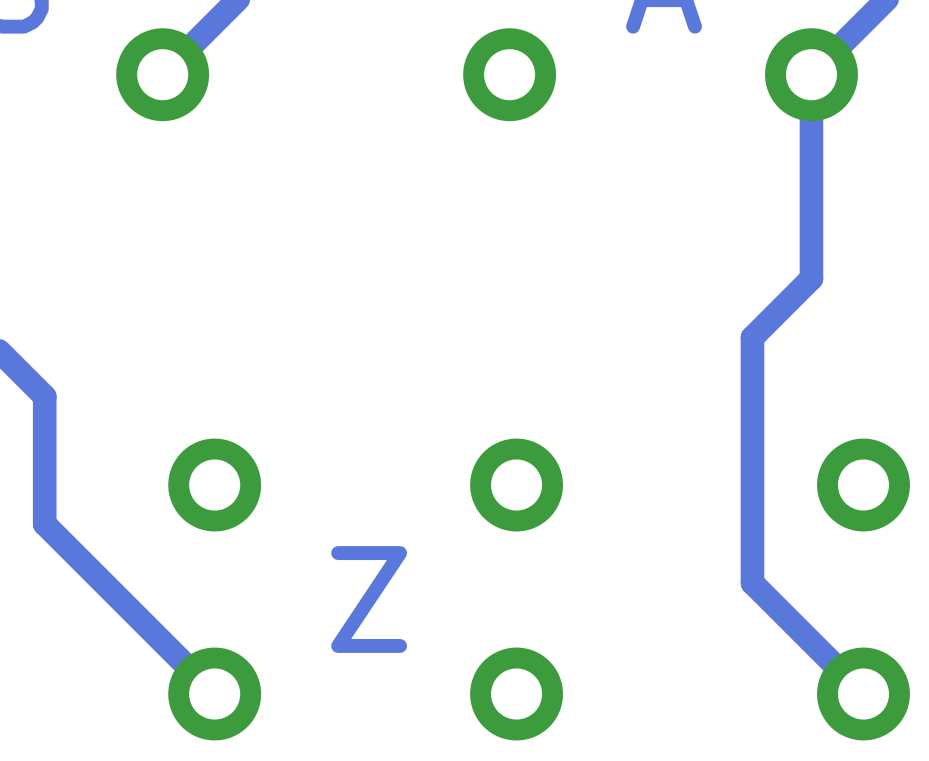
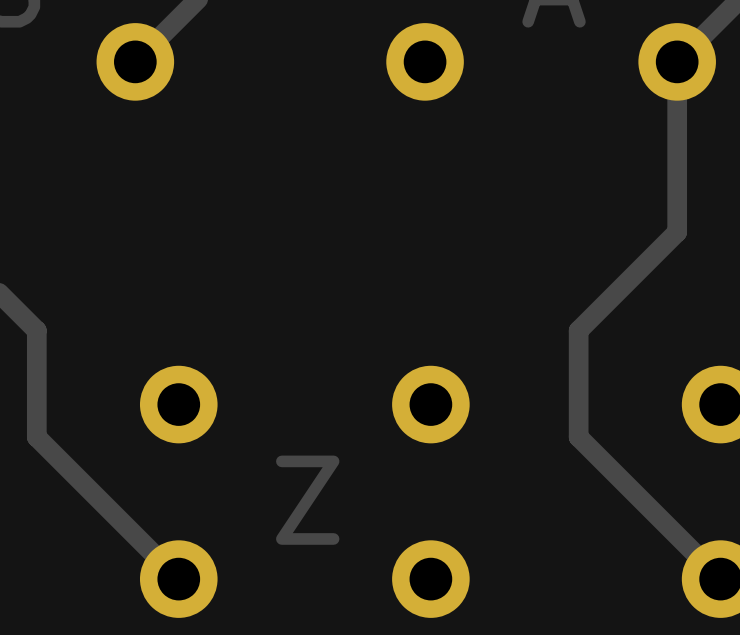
track: (752, 337) (752, 583) -> (627, 281) (578, 330) (578, 437) (627, 486)

